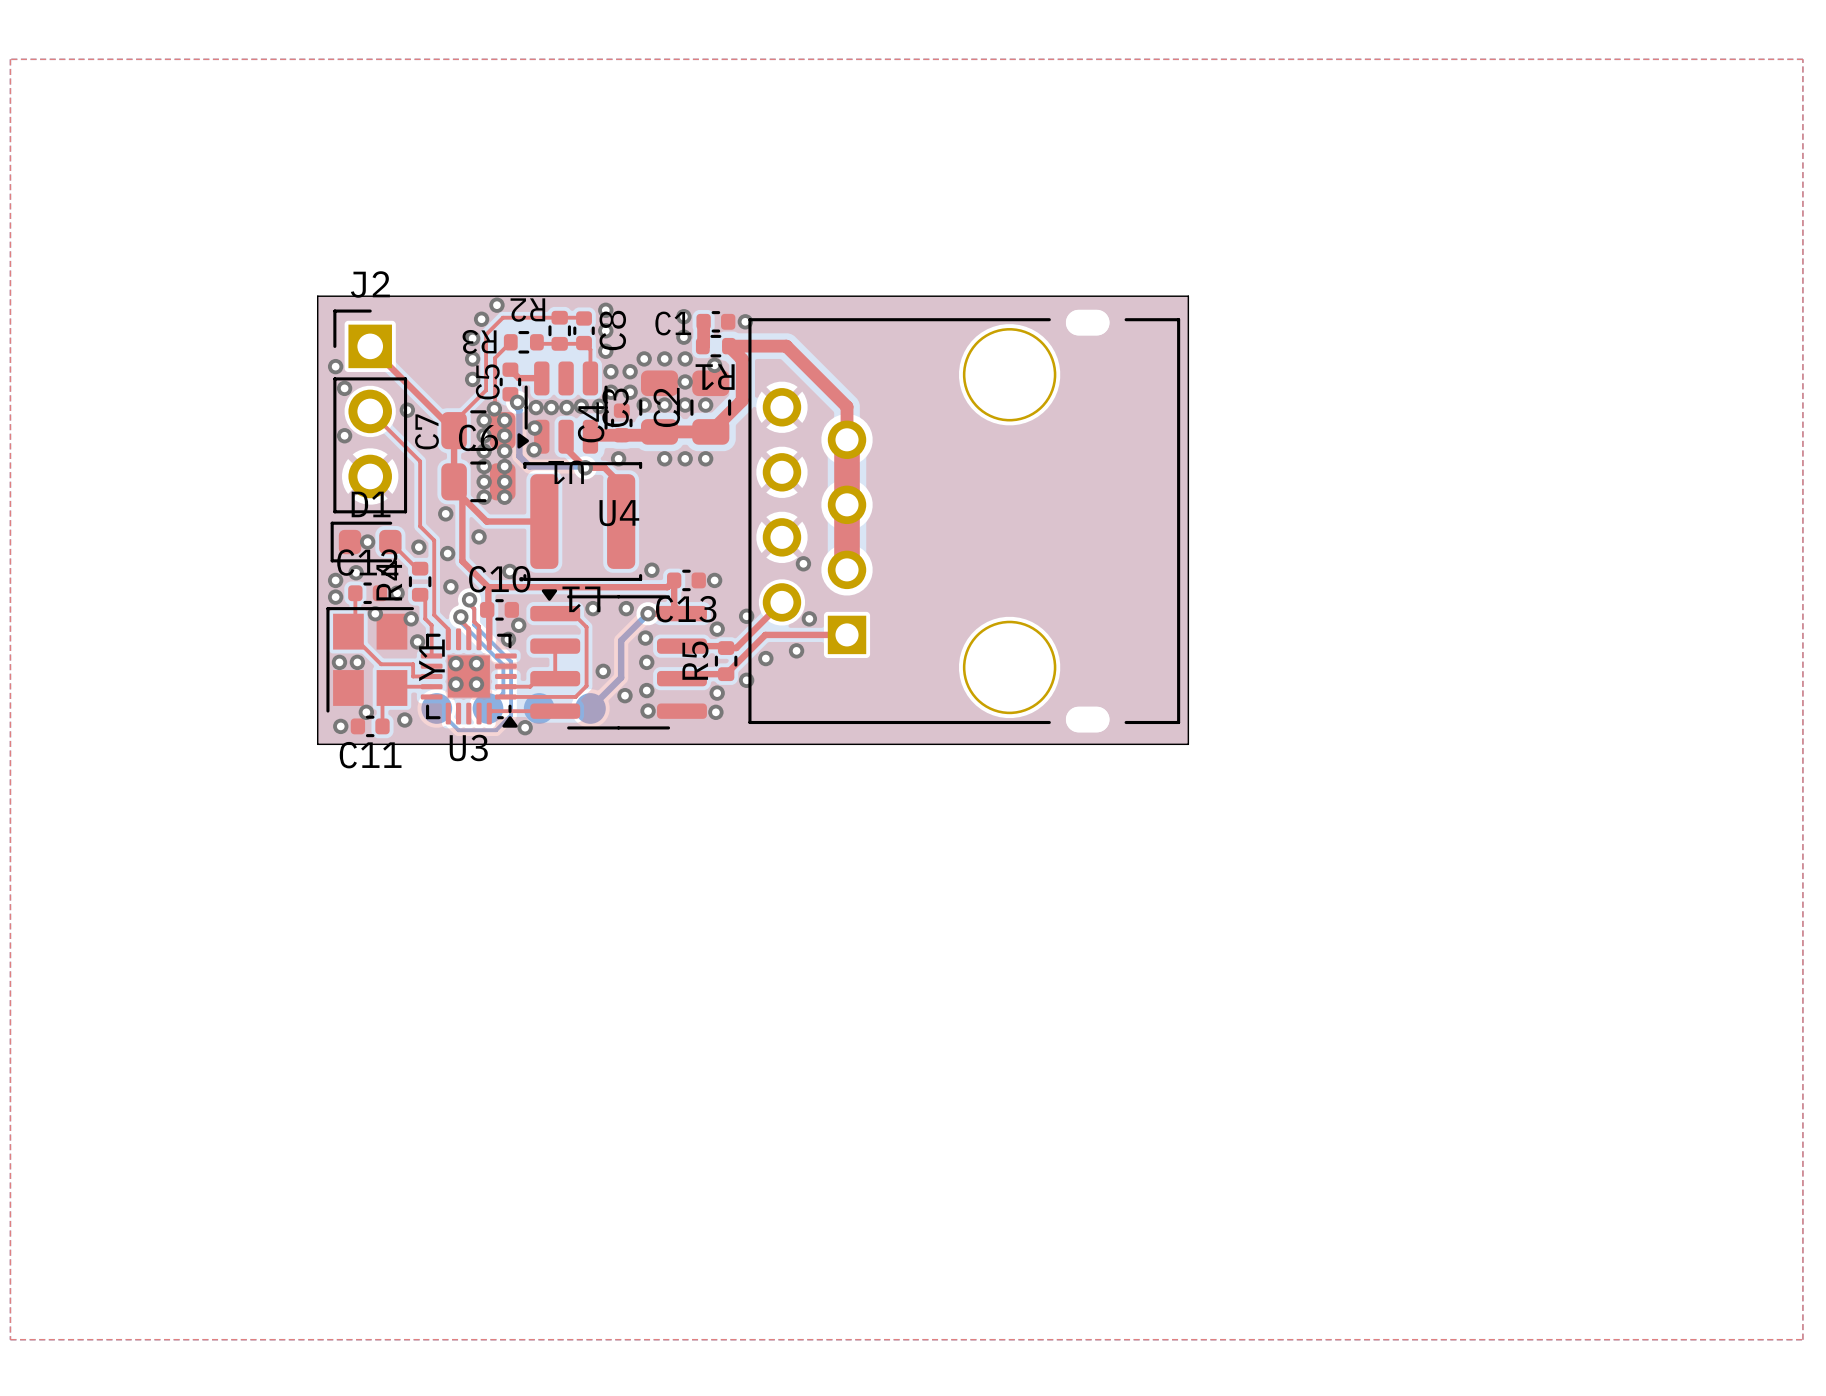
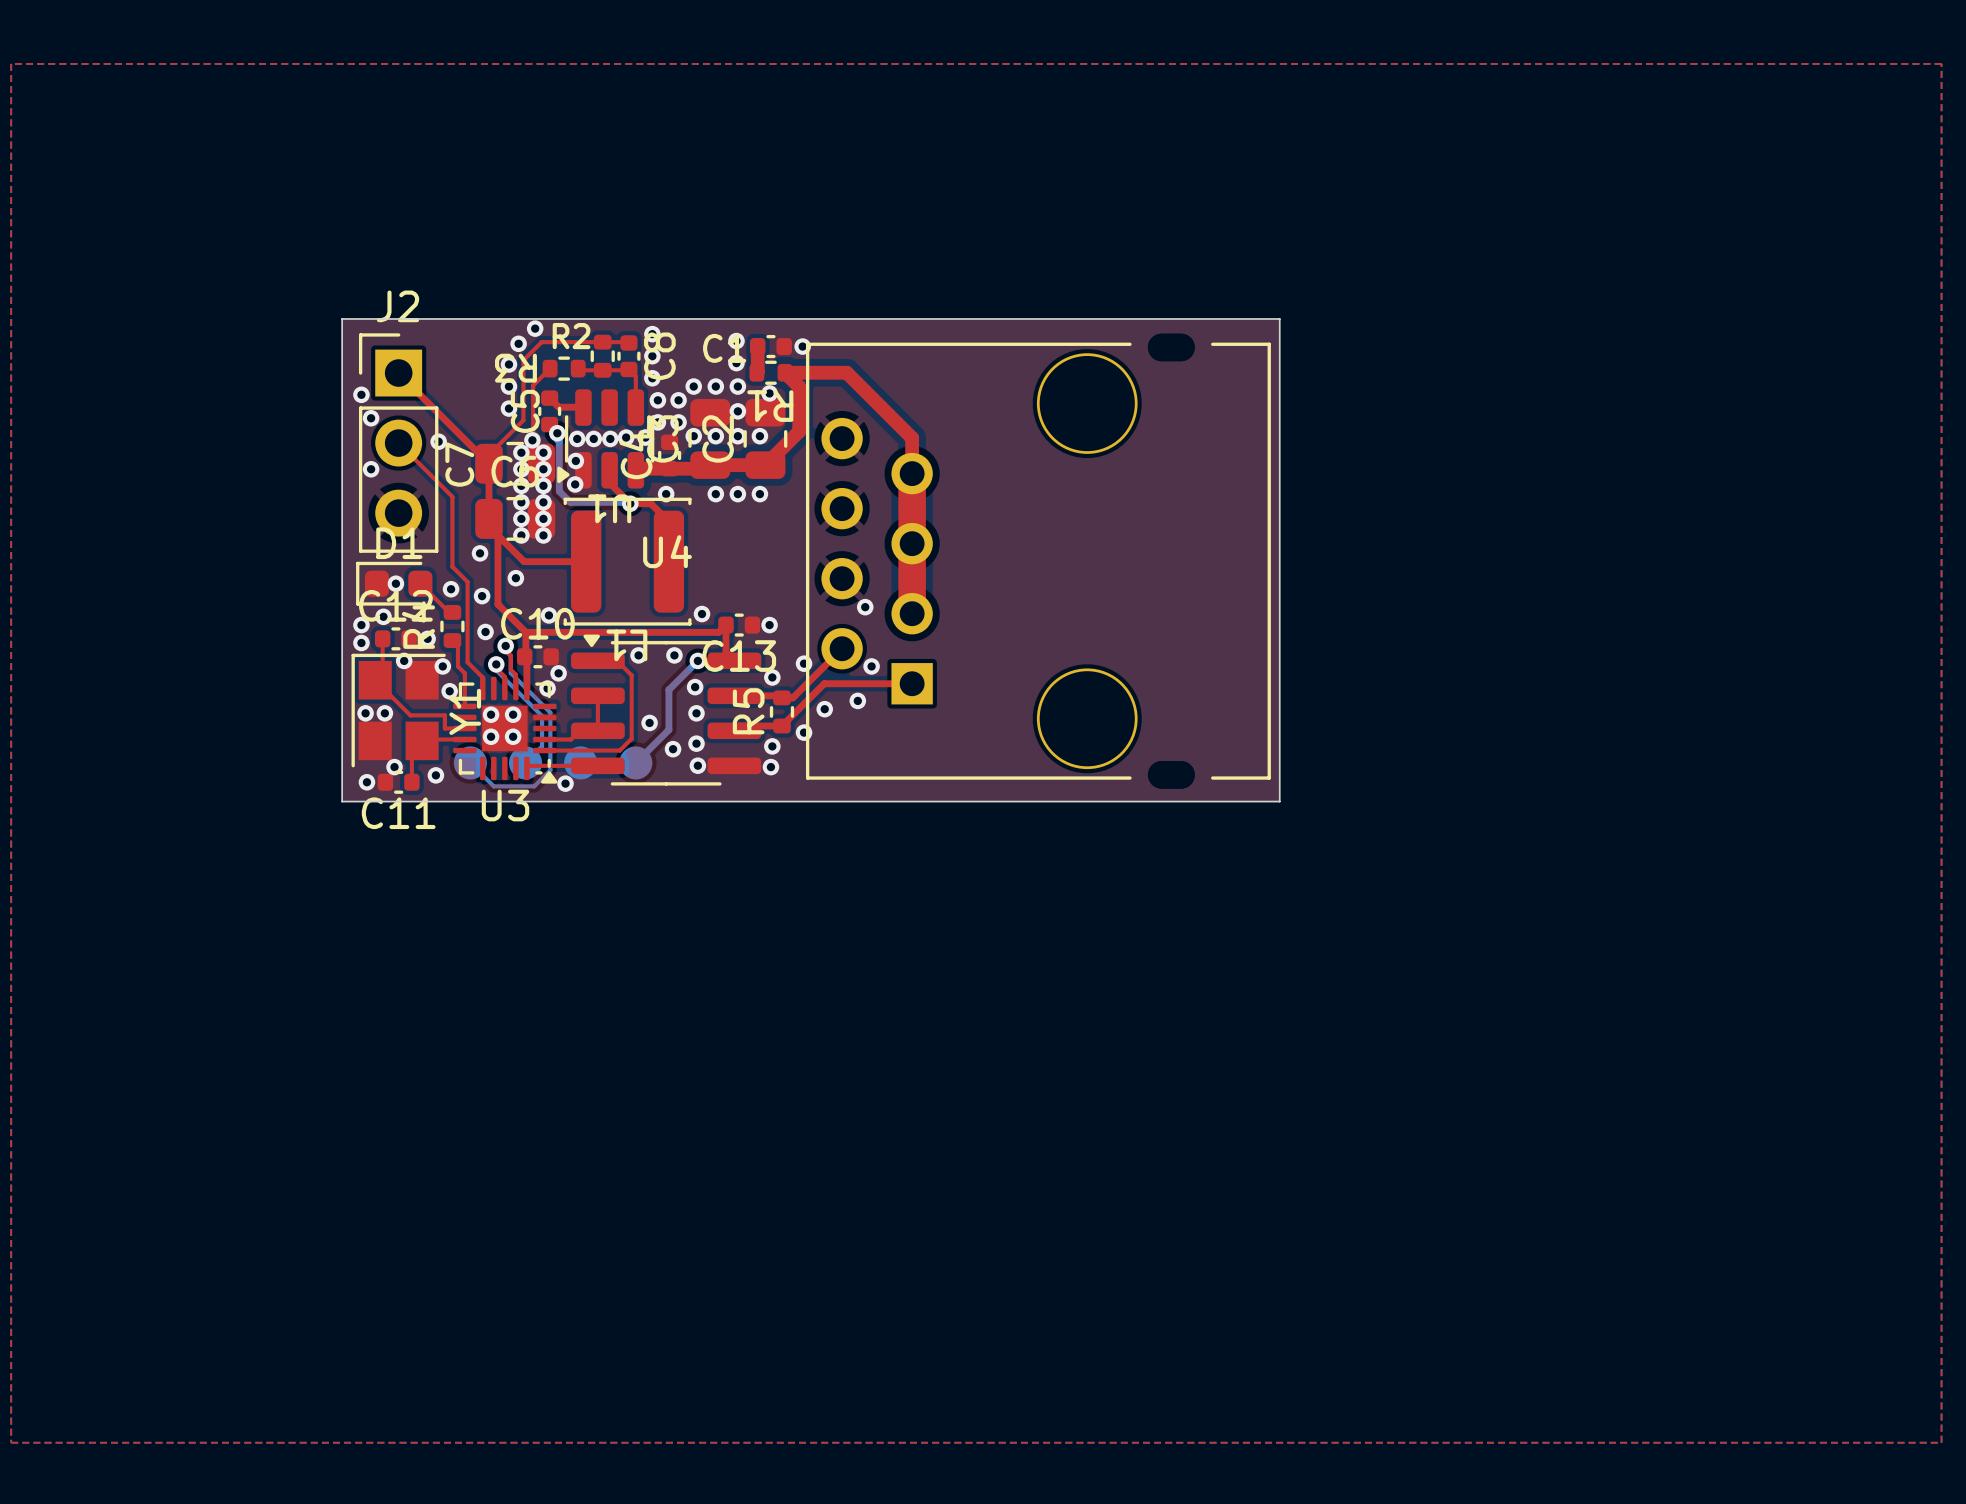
R2 name rotation: 0° (527, 310) -> 180° (571, 336)

